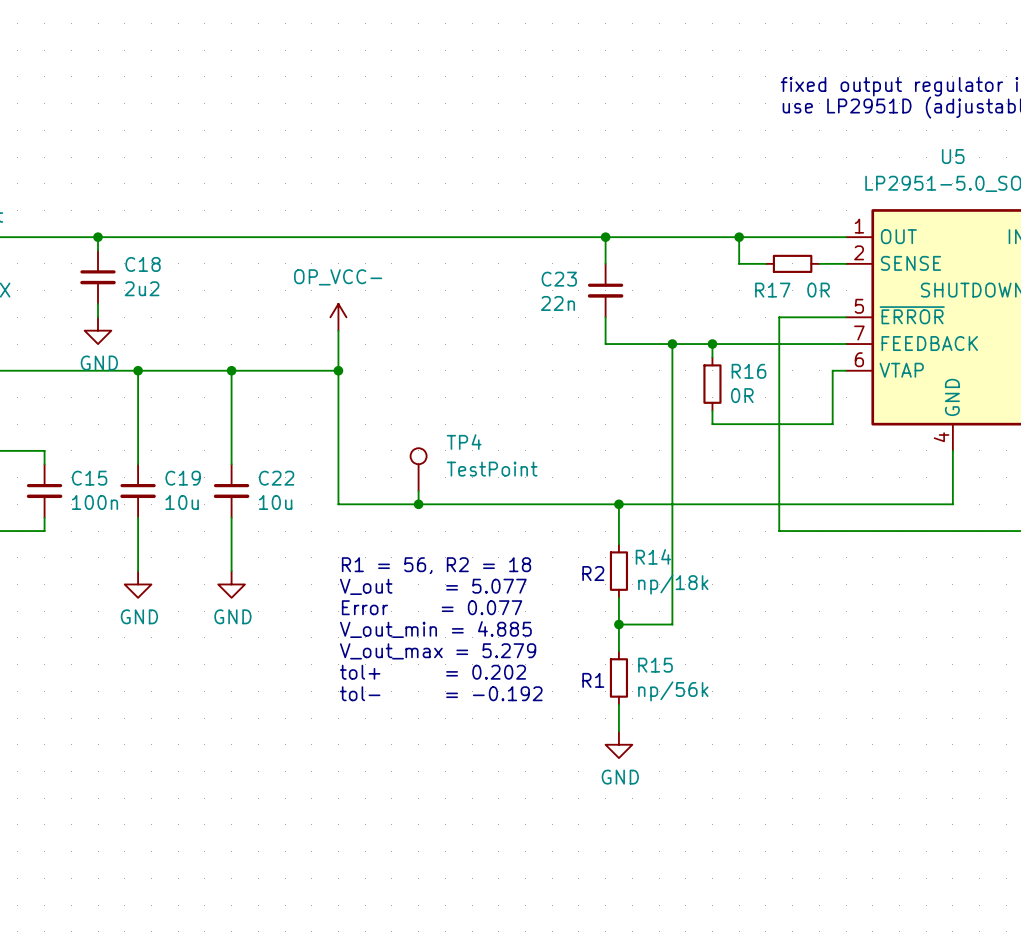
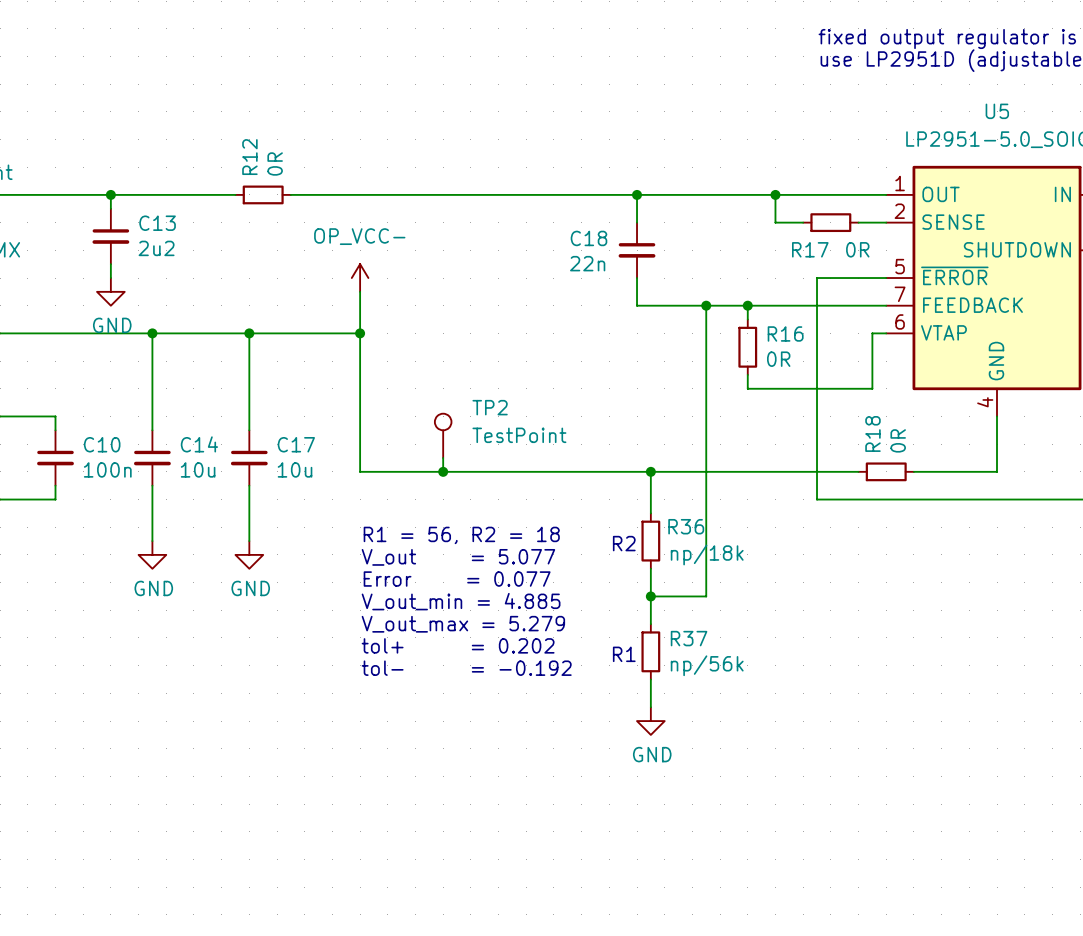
wire: (218, 237) (271, 237) -> none
R12: none -> 0R (263, 194)
C18 name: C18 (143, 264) -> C13 (157, 223)
C23 name: C23 (559, 279) -> C18 (588, 238)
TP4 name: TP4 (464, 442) -> TP2 (490, 407)
C15 name: C15 (89, 478) -> C10 (102, 444)
C19 name: C19 (183, 478) -> C14 (199, 444)
C22 name: C22 (276, 478) -> C17 (296, 444)
wire: (819, 504) (872, 504) -> none
R18: none -> 0R (886, 471)
R14 name: R14 (653, 556) -> R36 (686, 526)
R15 name: R15 (655, 665) -> R37 (689, 638)

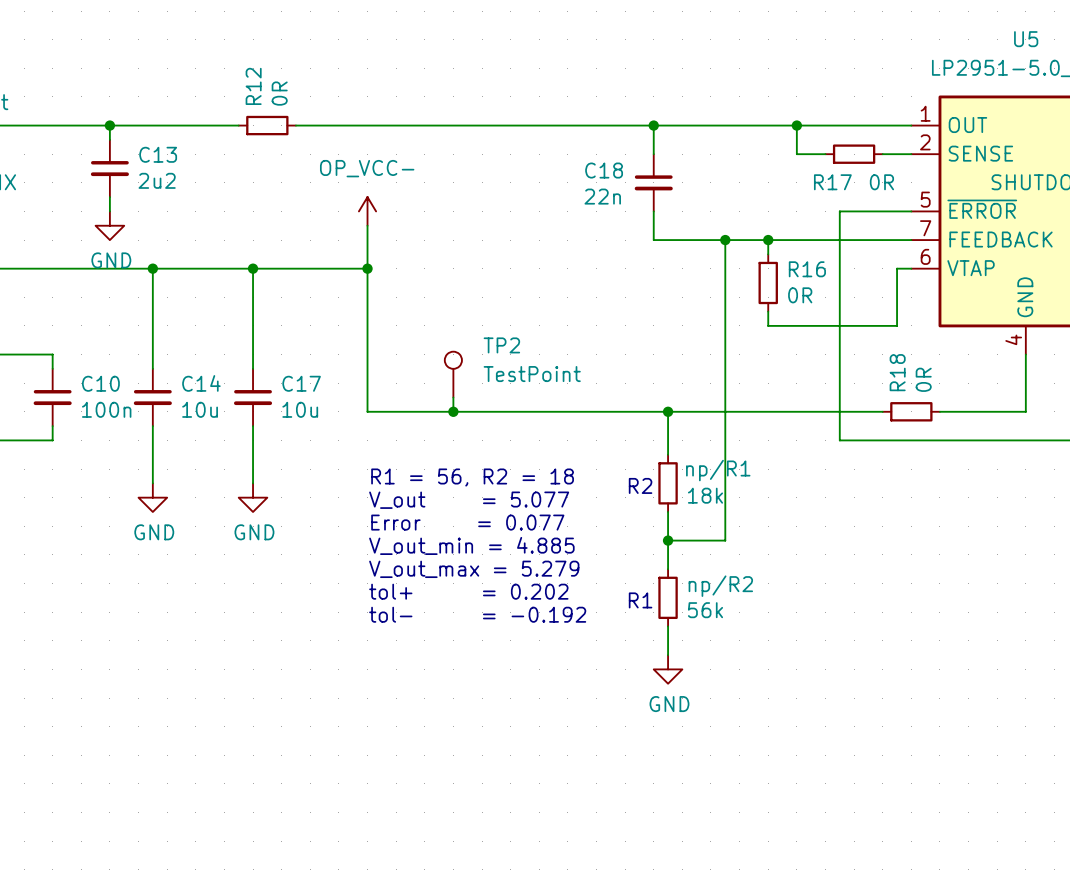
R36 name: R36 (686, 526) -> np/R1 (718, 470)
R36 value: np/18k (707, 554) -> 18k (705, 495)
R37 name: R37 (689, 638) -> np/R2 (720, 586)
R37 value: np/56k (707, 665) -> 56k (705, 610)

